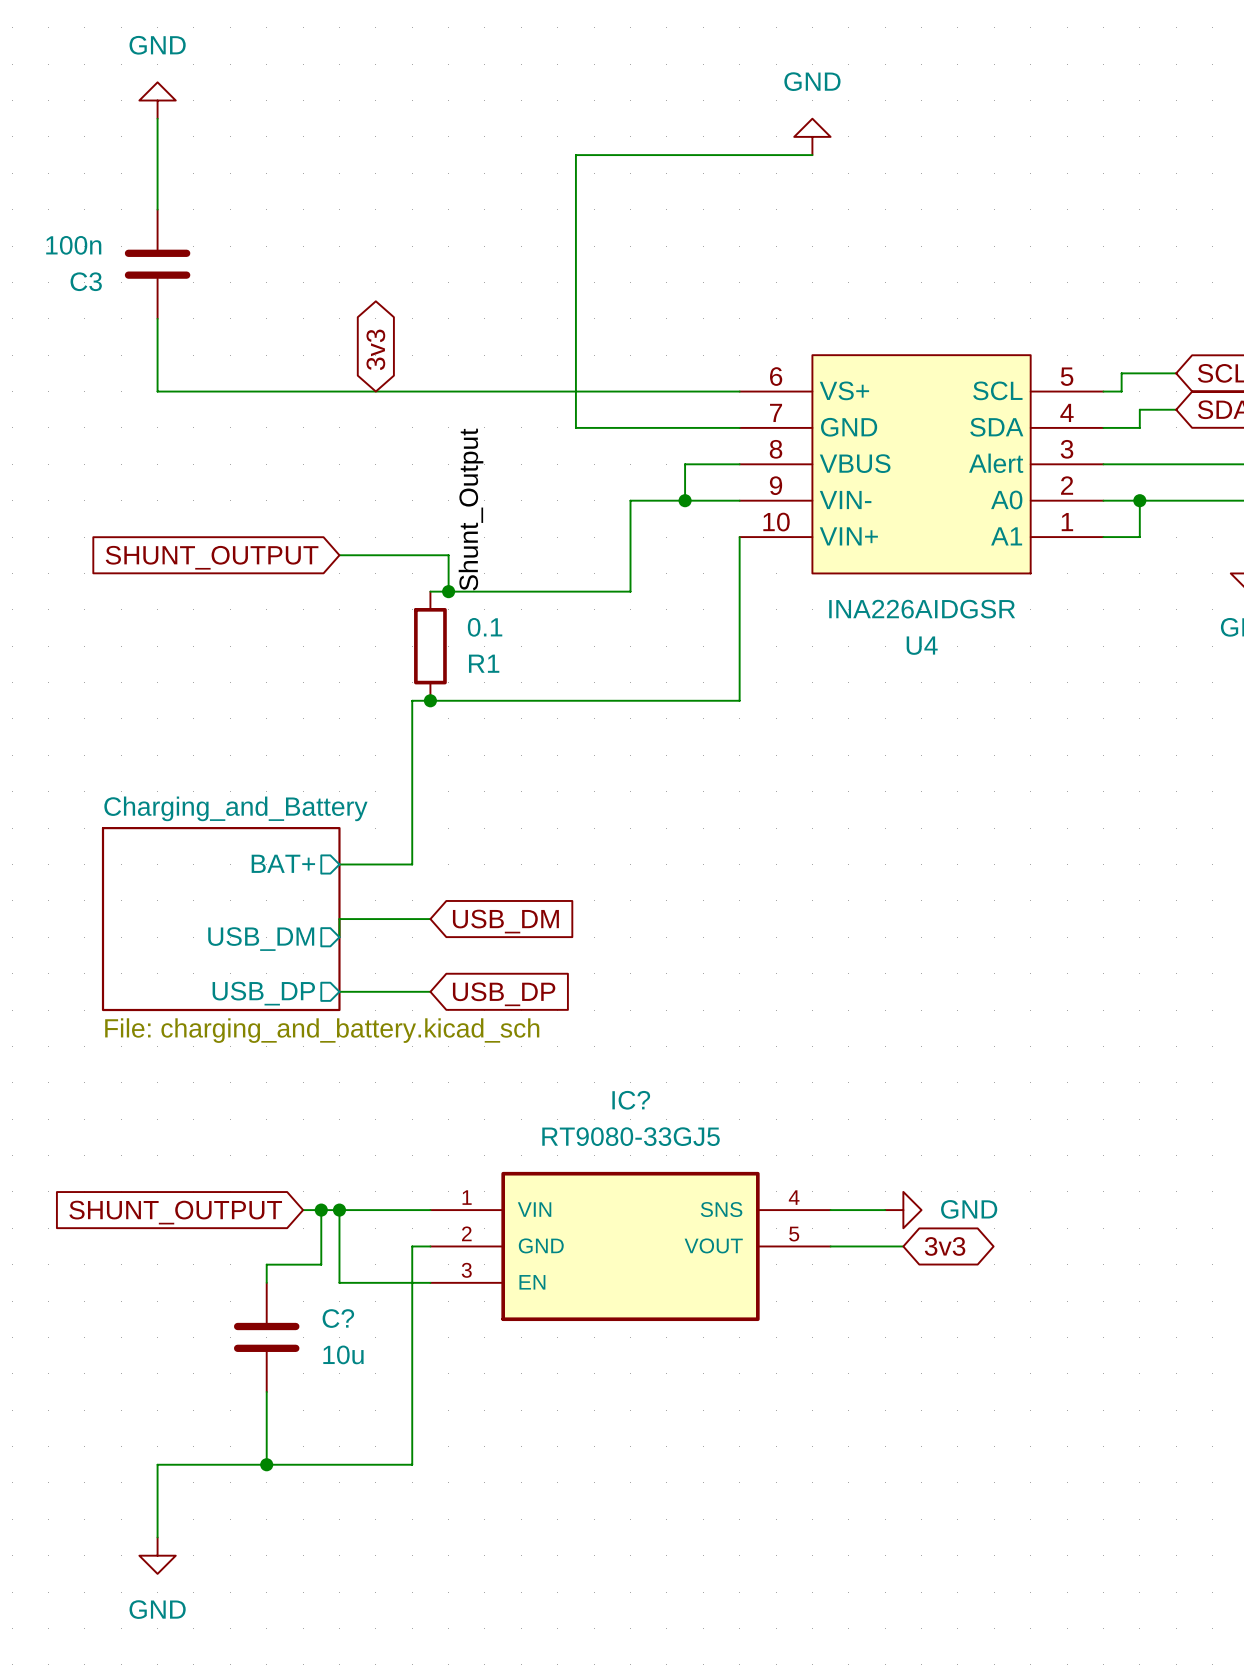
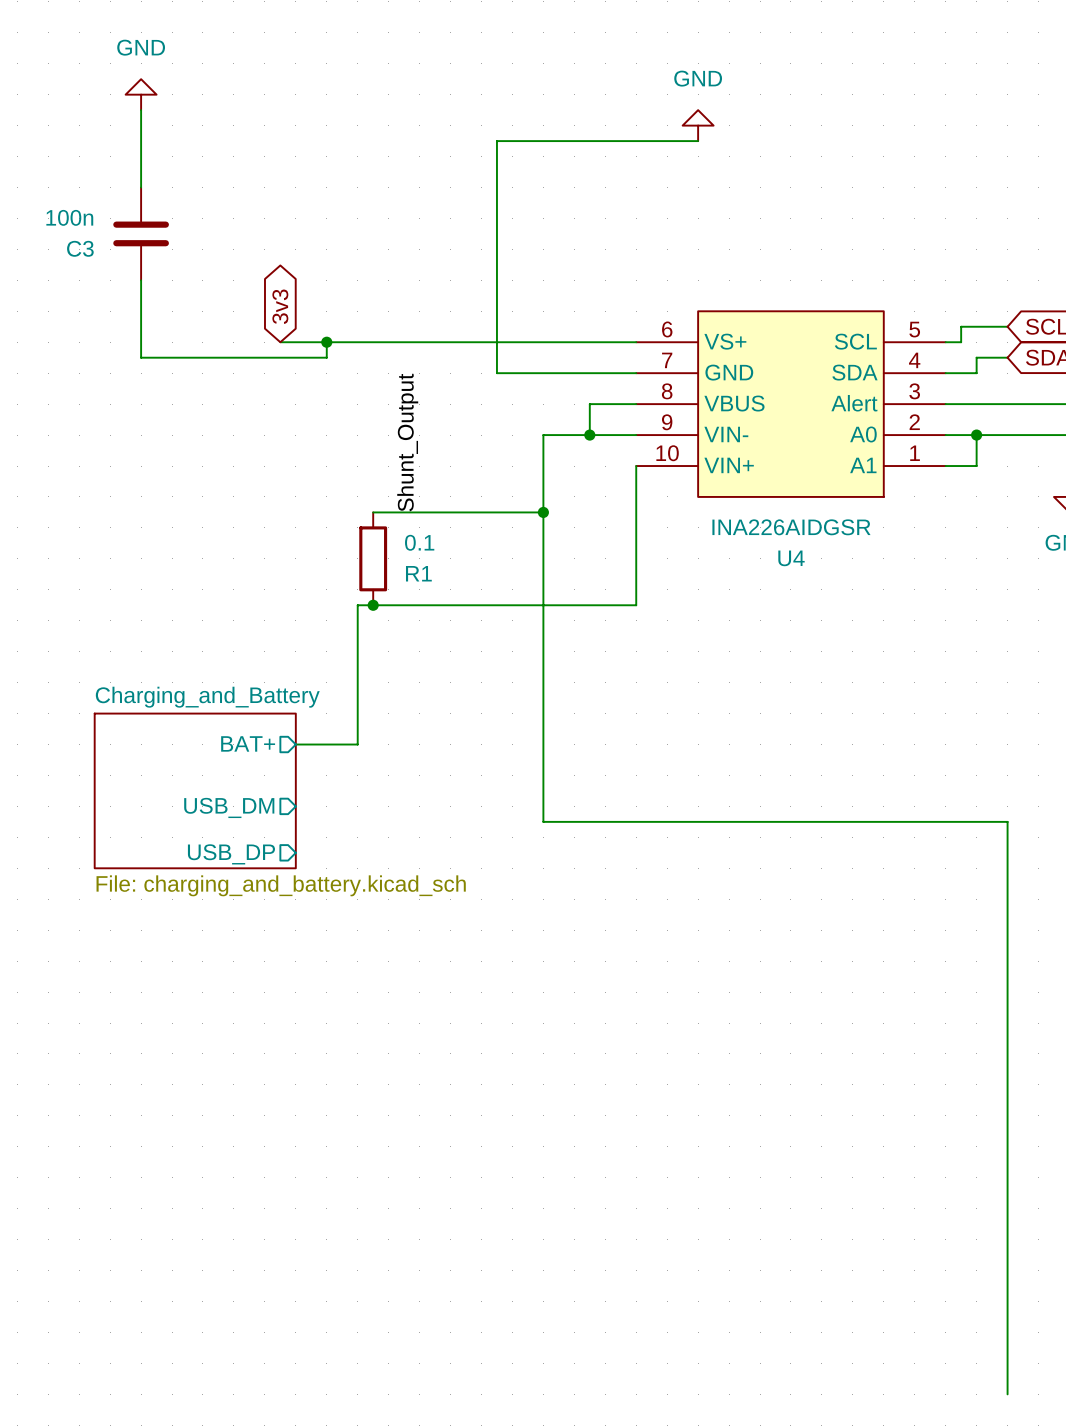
global label position: 3v3 (375, 349) -> 3v3 (280, 306)
wire: (157, 391) (321, 391) -> (141, 342) (141, 357) (326, 357) (326, 342)
junction: none -> (326, 342)
wire: (339, 555) (448, 555) (448, 591) -> none
global label: SHUNT_OUTPUT (212, 557) -> none
junction: (448, 591) -> none
wire: none -> (543, 512) (543, 821) (1007, 821) (1007, 1394)
junction: none -> (543, 512)
wire: (430, 919) (339, 919) (339, 937) -> none
global label: USB_DM (505, 921) -> none
wire: (339, 991) (430, 991) -> none
global label: USB_DP (504, 994) -> none
wire: (303, 1210) (430, 1210) -> none
wire: (321, 1210) (321, 1264) (266, 1264) (266, 1282) -> none
junction: (321, 1210) -> none
wire: (339, 1210) (339, 1282) (430, 1282) -> none
junction: (339, 1210) -> none
wire: (830, 1210) (885, 1210) -> none
power symbol: GND (903, 1210) -> none
global label: SHUNT_OUTPUT (175, 1212) -> none
wire: (430, 1246) (412, 1246) (412, 1464) (157, 1464) (157, 1537) -> none
IC?: RT9080-33GJ5 (630, 1246) -> none
wire: (830, 1246) (903, 1246) -> none
global label: 3v3 (945, 1246) -> none
C?: 10u (266, 1337) -> none
wire: (266, 1391) (266, 1464) -> none
junction: (266, 1464) -> none
power symbol: GND (157, 1555) -> none

